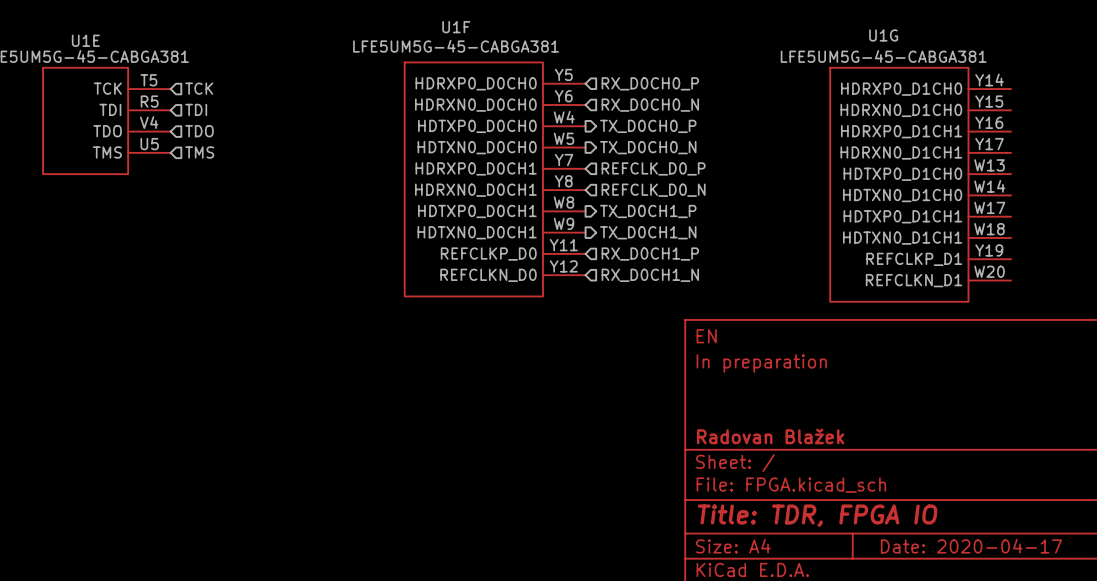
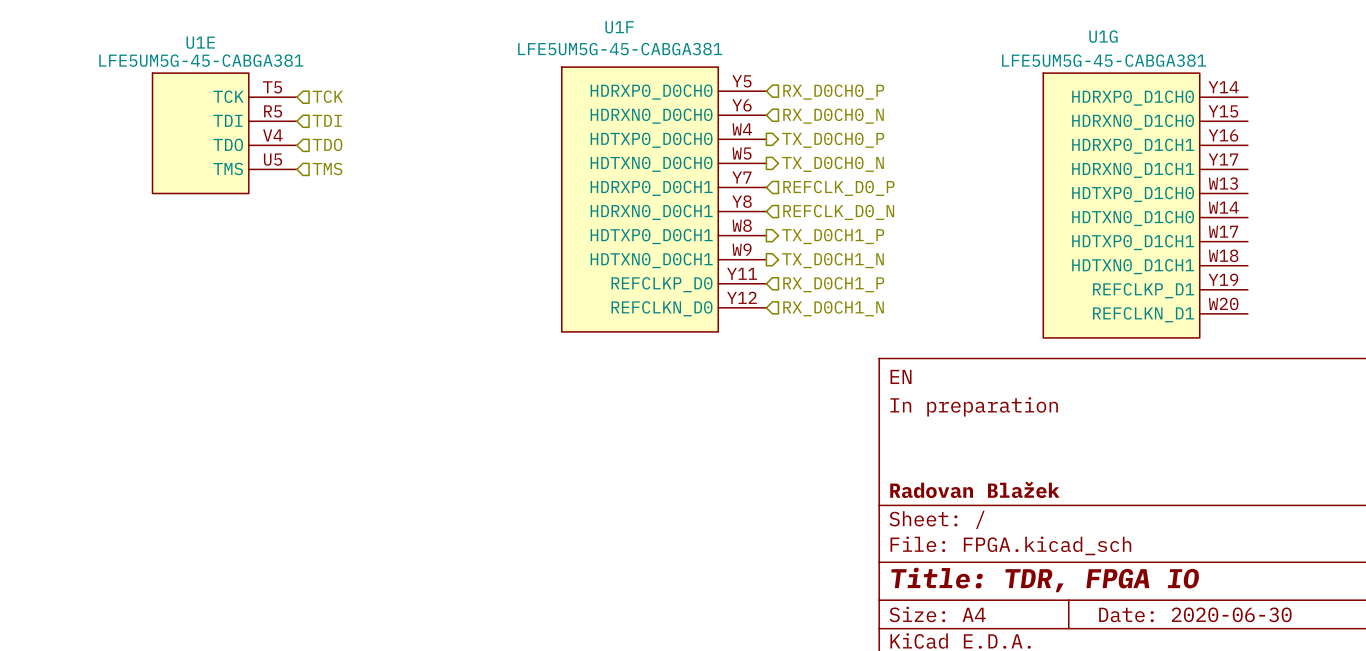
title block: Date: 2020-04-17 (971, 546) -> Date: 2020-06-30 (1195, 614)

